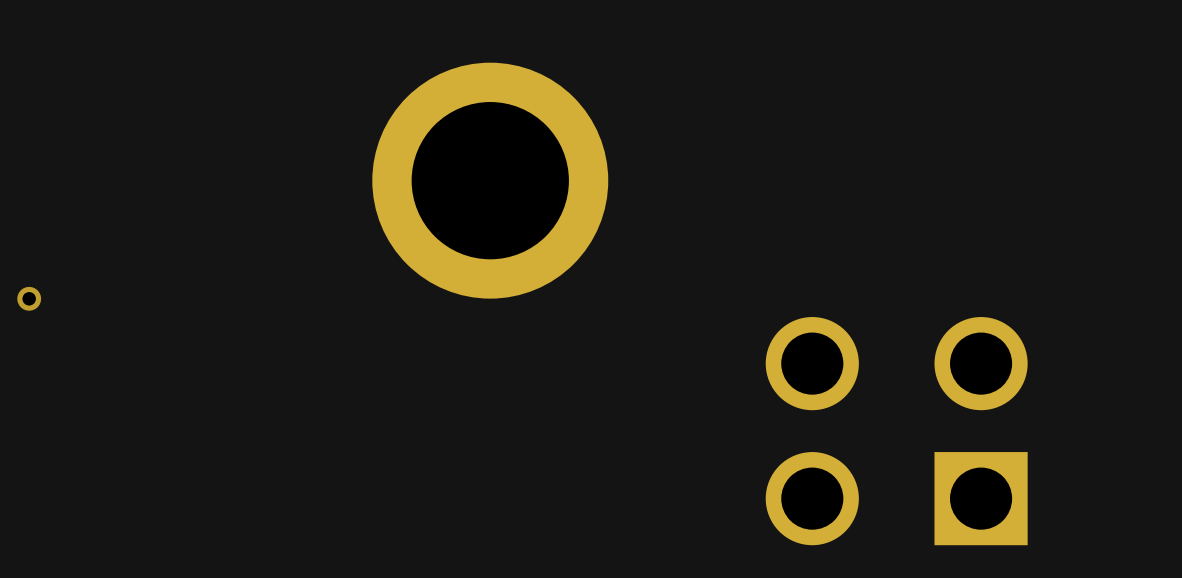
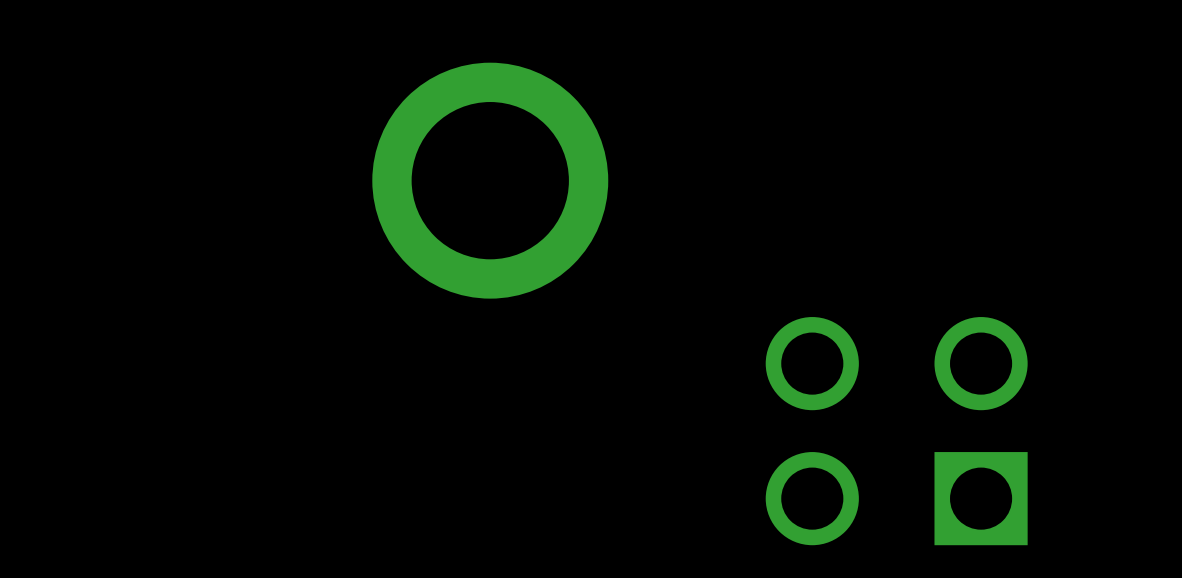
via: (29, 298) -> none

